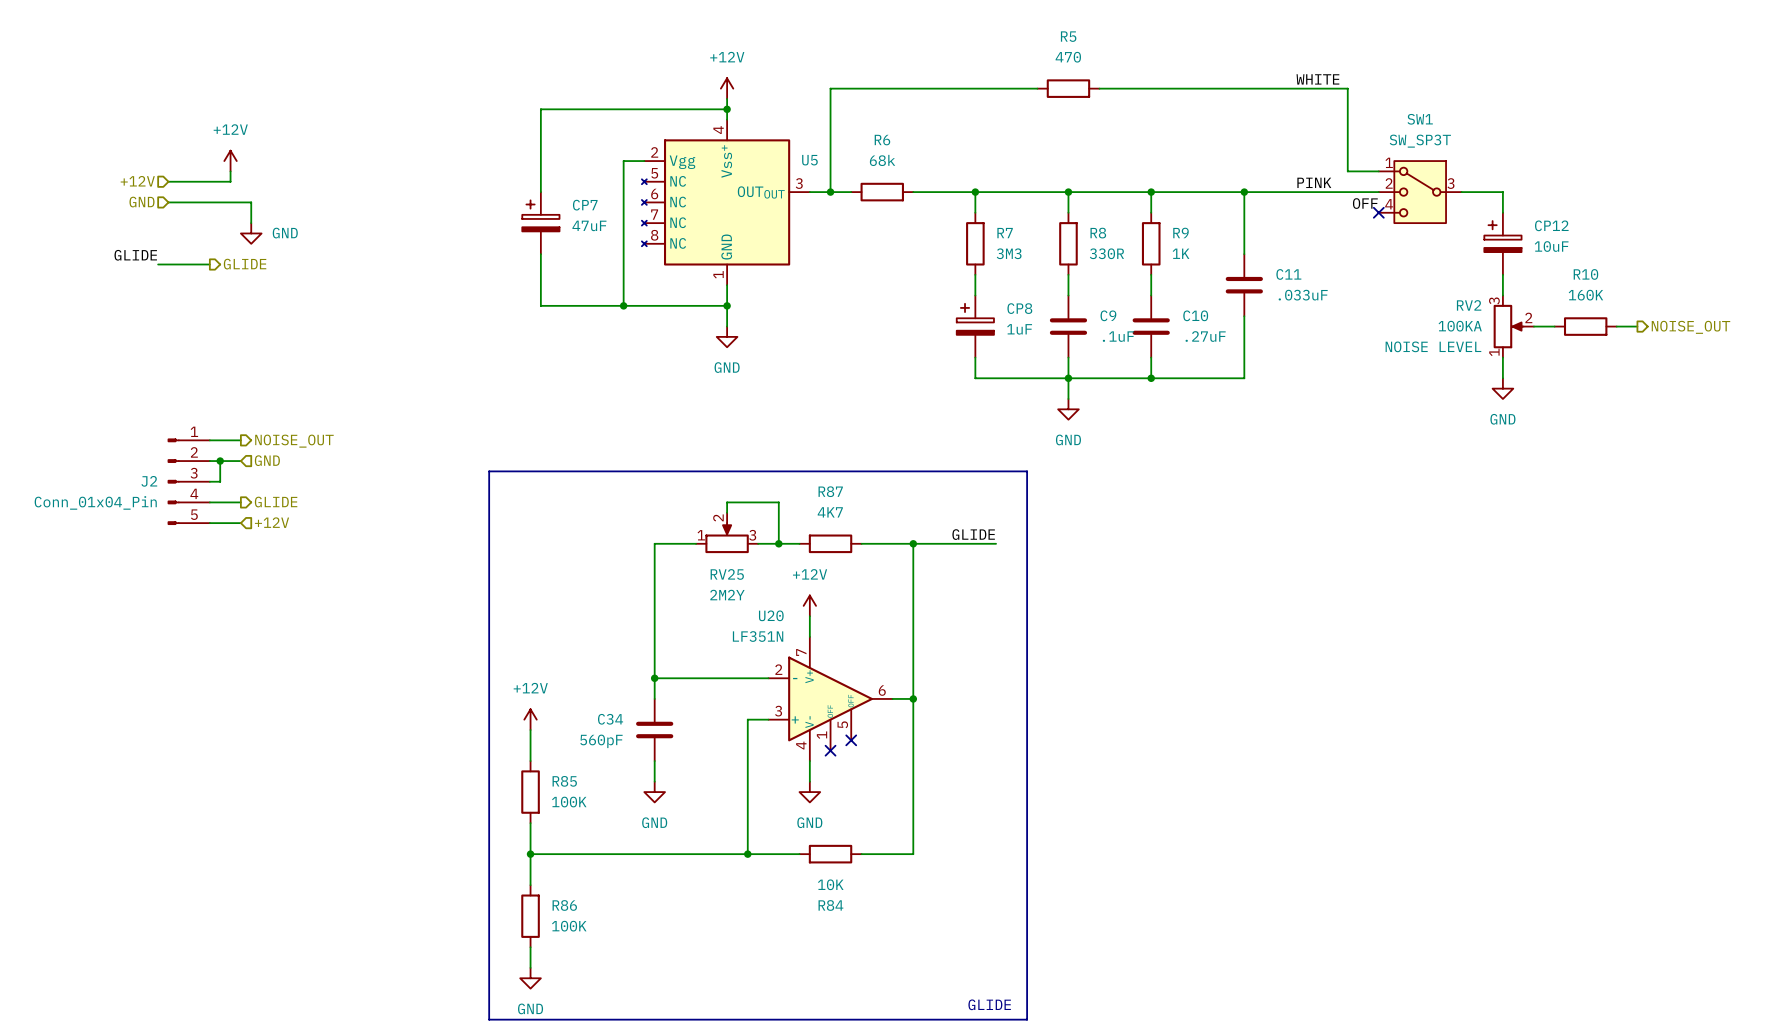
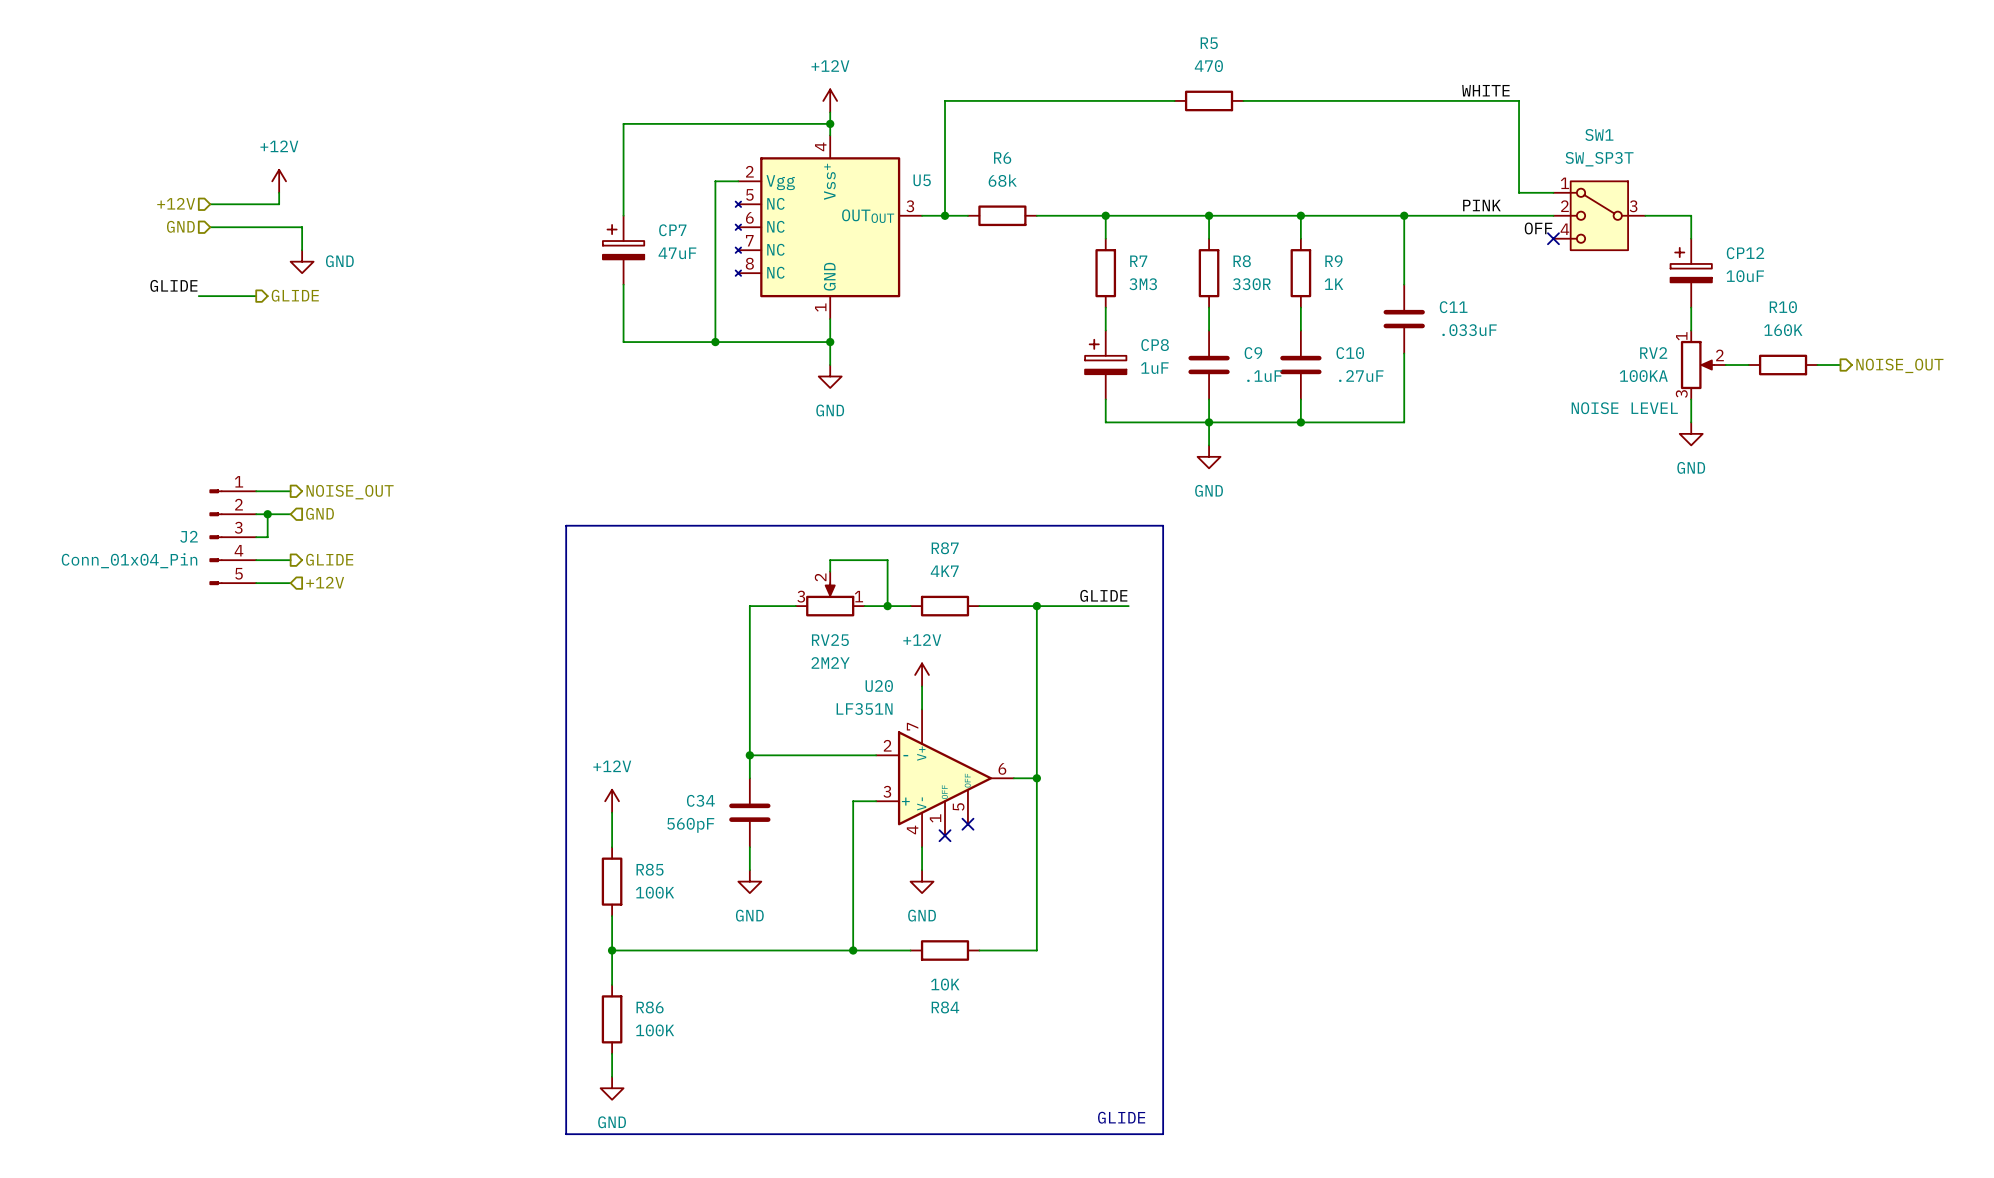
RV2 flip: as is (1508, 326) -> up-down (1697, 365)
RV2 text position: NOISE LEVEL (1433, 346) -> NOISE LEVEL (1624, 408)
RV25 flip: as is (727, 538) -> left-right (830, 599)

